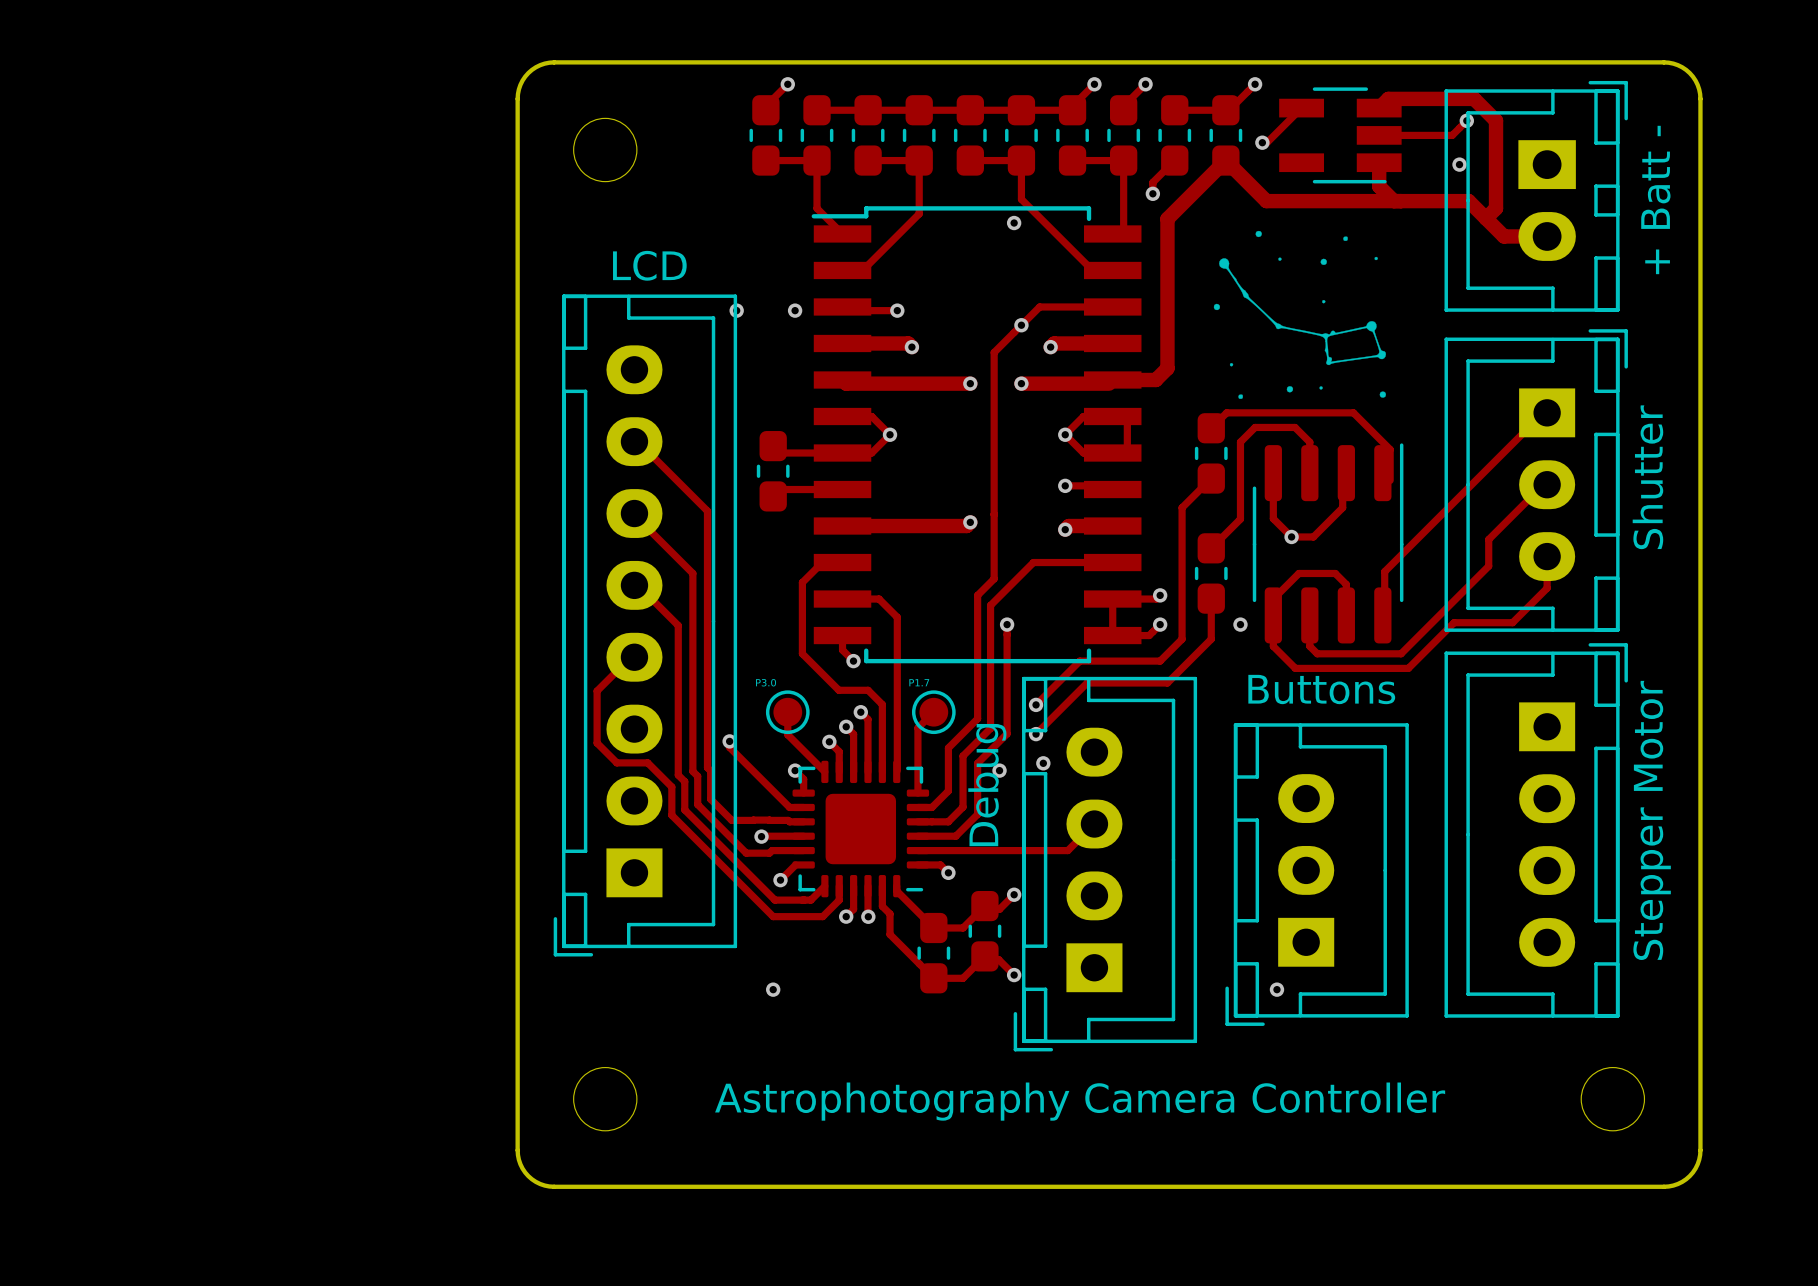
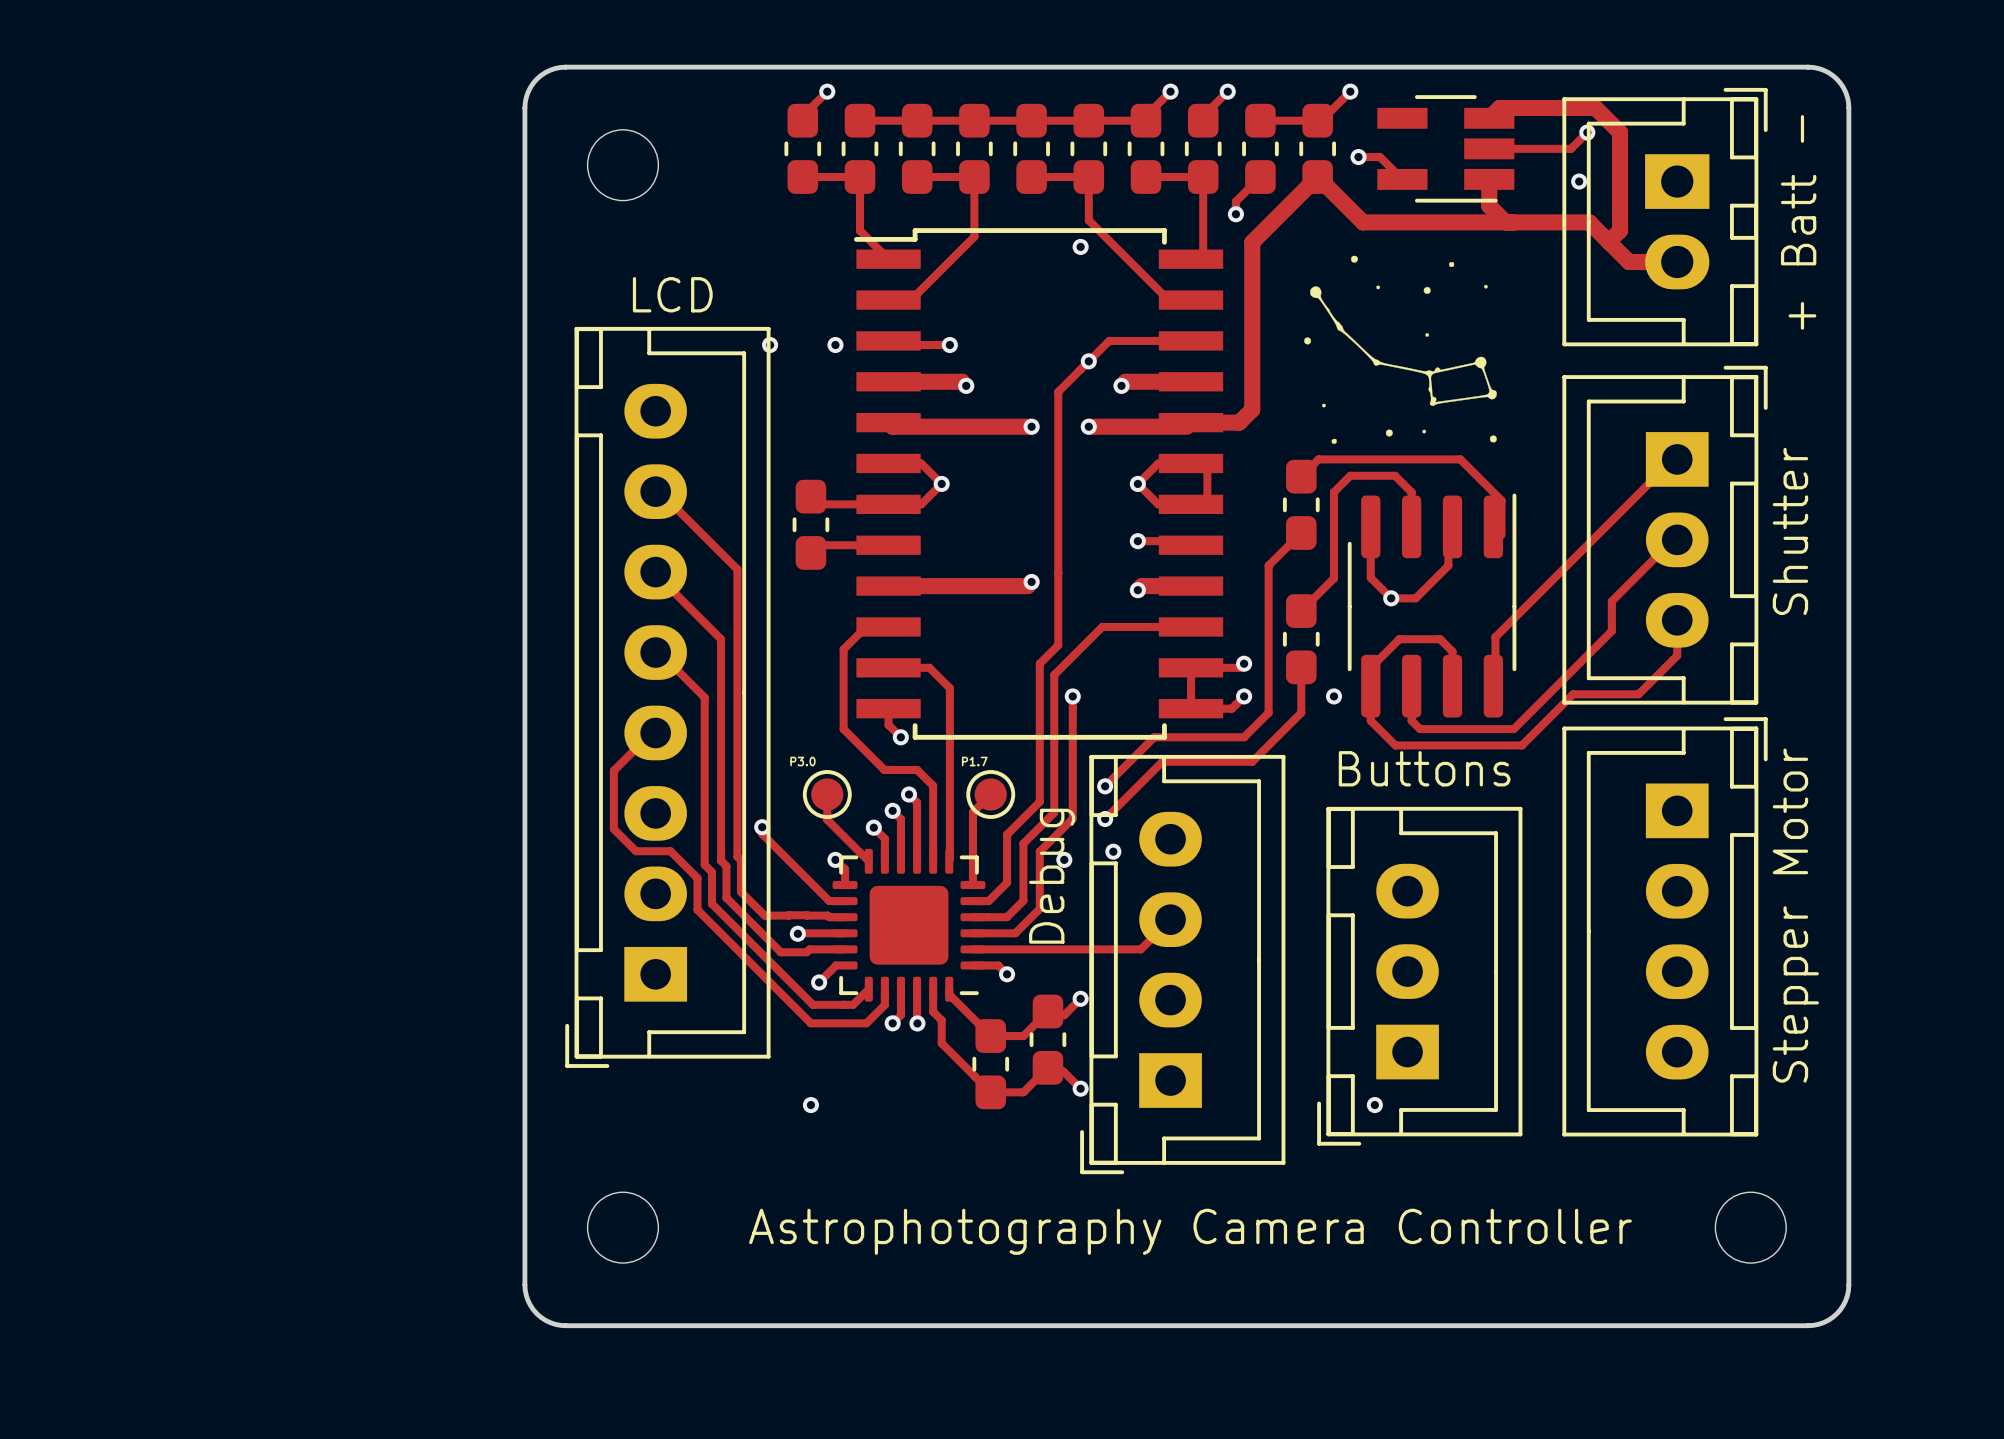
track: (1301, 108) (1266, 142) -> (1402, 179) (1380, 157) (1363, 157)

